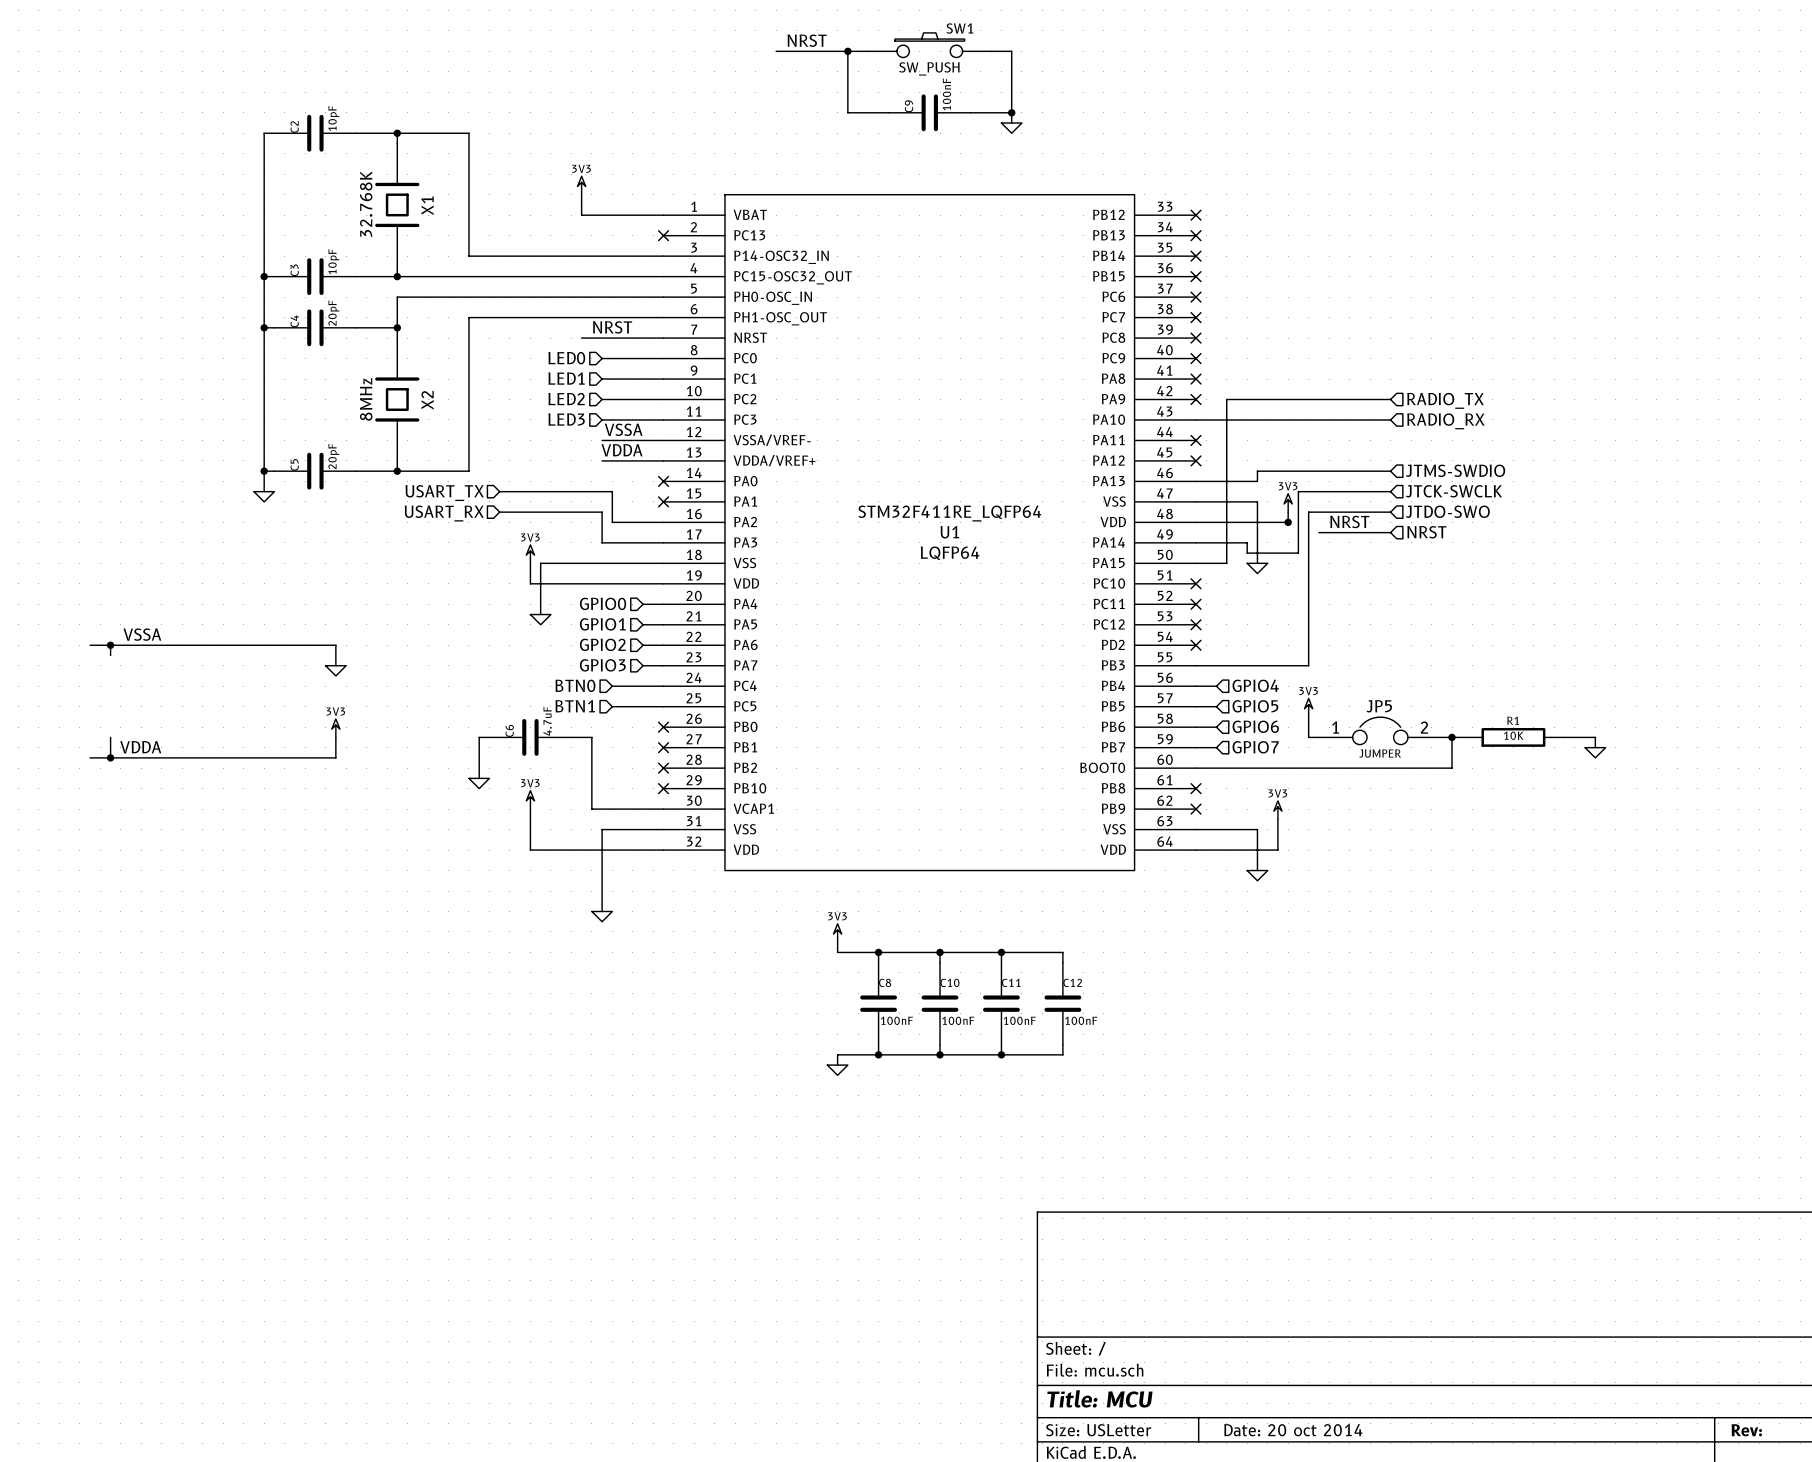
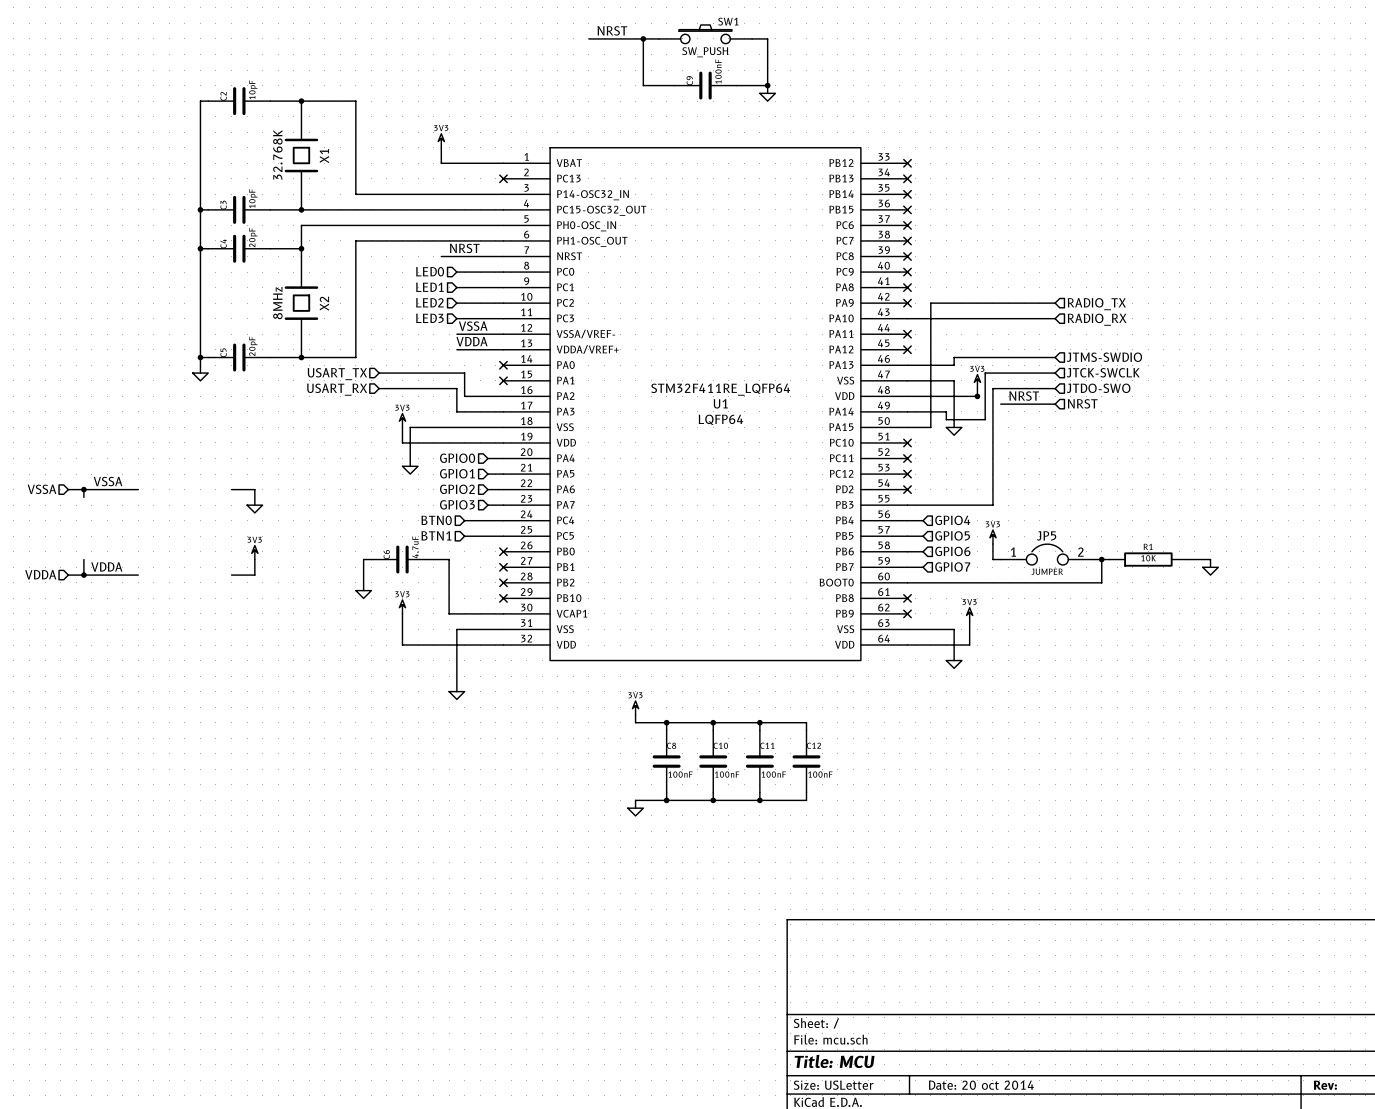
hierarchical label: none -> VSSA (41, 489)
wire: (182, 645) (305, 645) -> none
hierarchical label: none -> VDDA (40, 574)
wire: (182, 757) (305, 757) -> none

